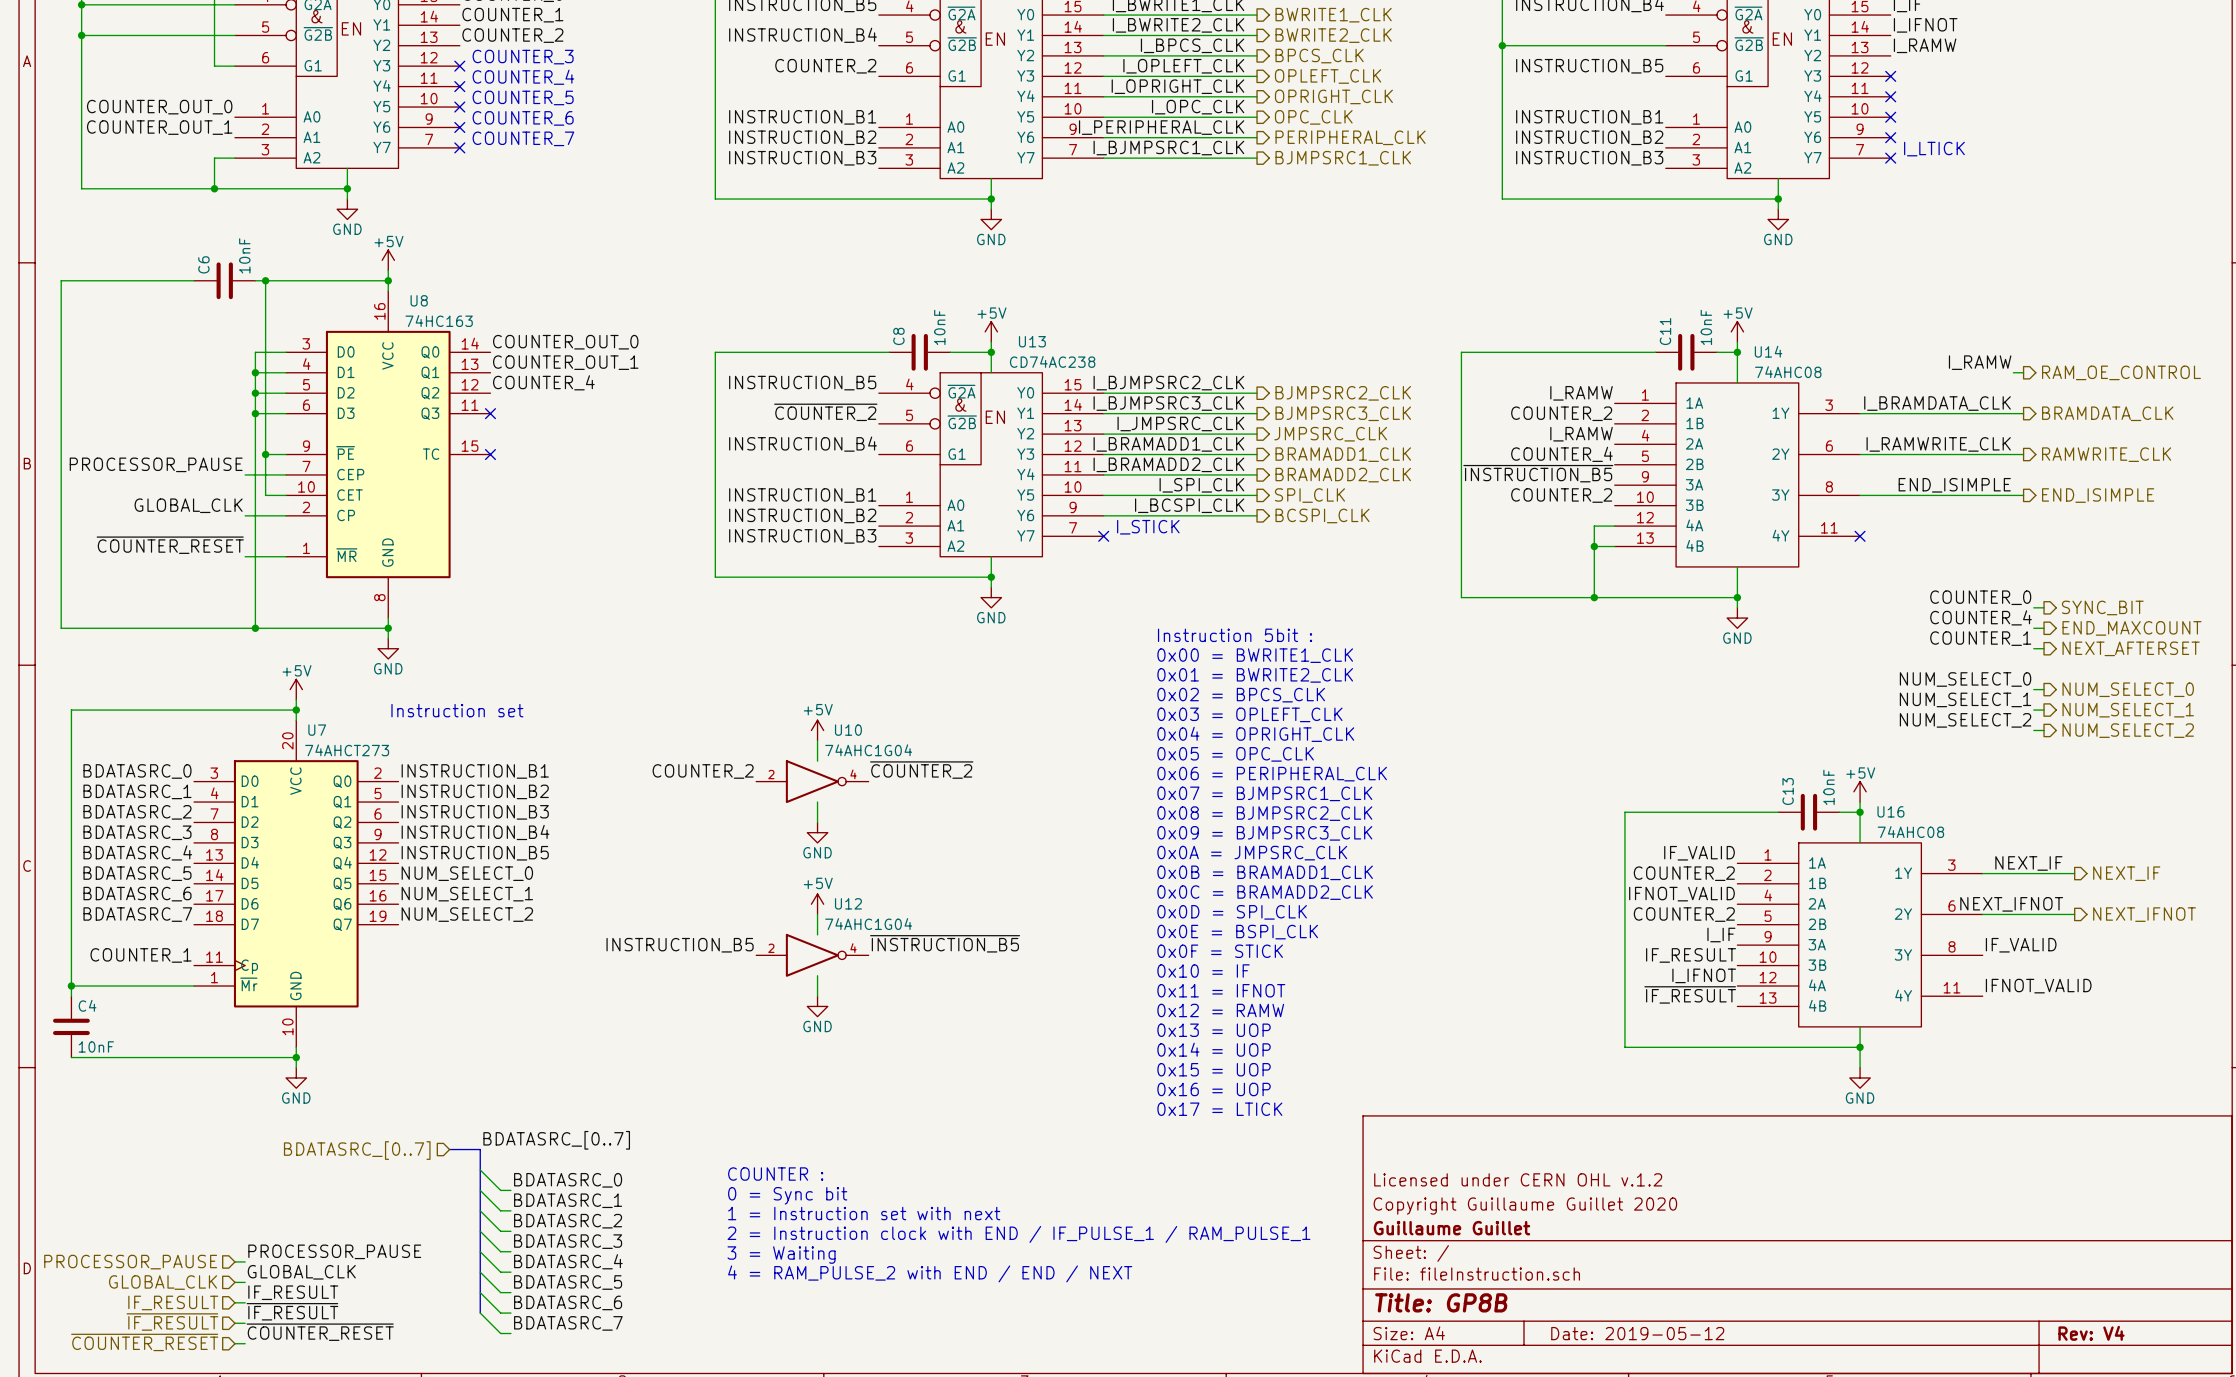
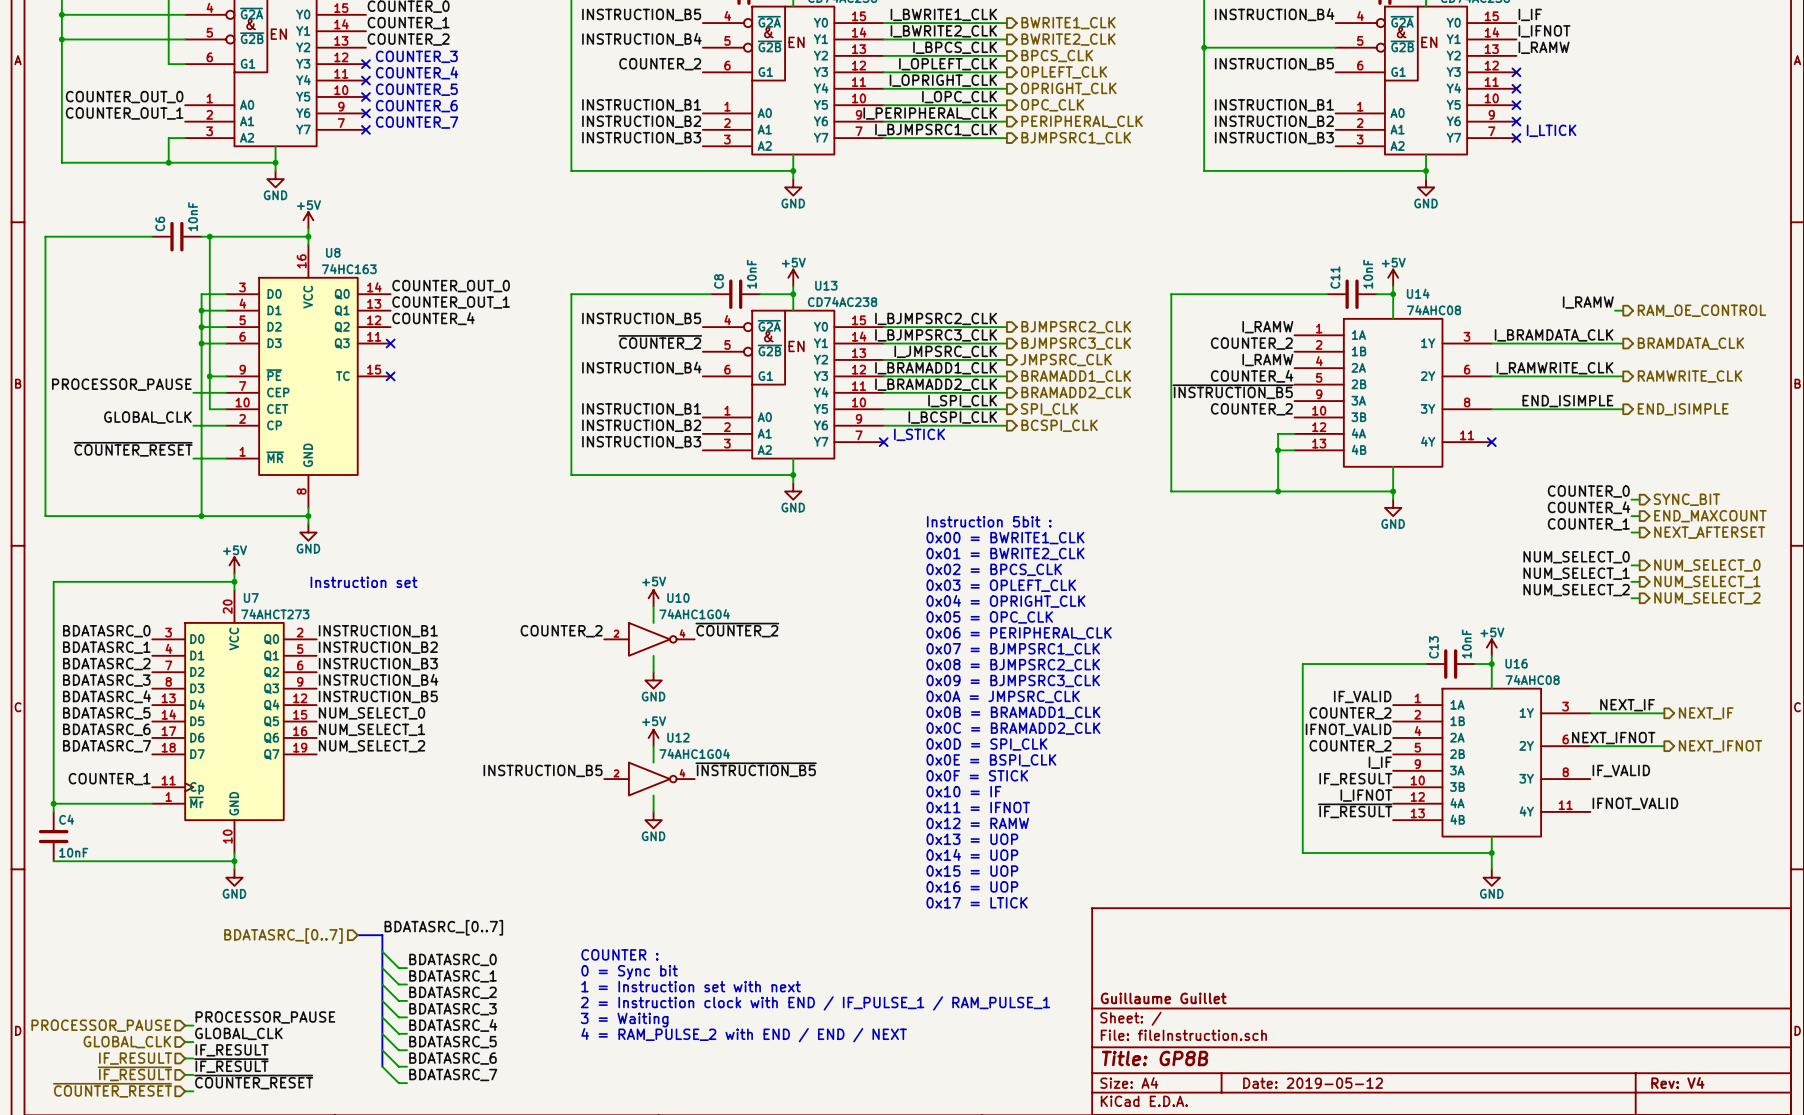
title block: Licensed under CERN OHL v.1.2 (1518, 1179) -> none
title block: Copyright Guillaume Guillet 2020 (1525, 1206) -> none

